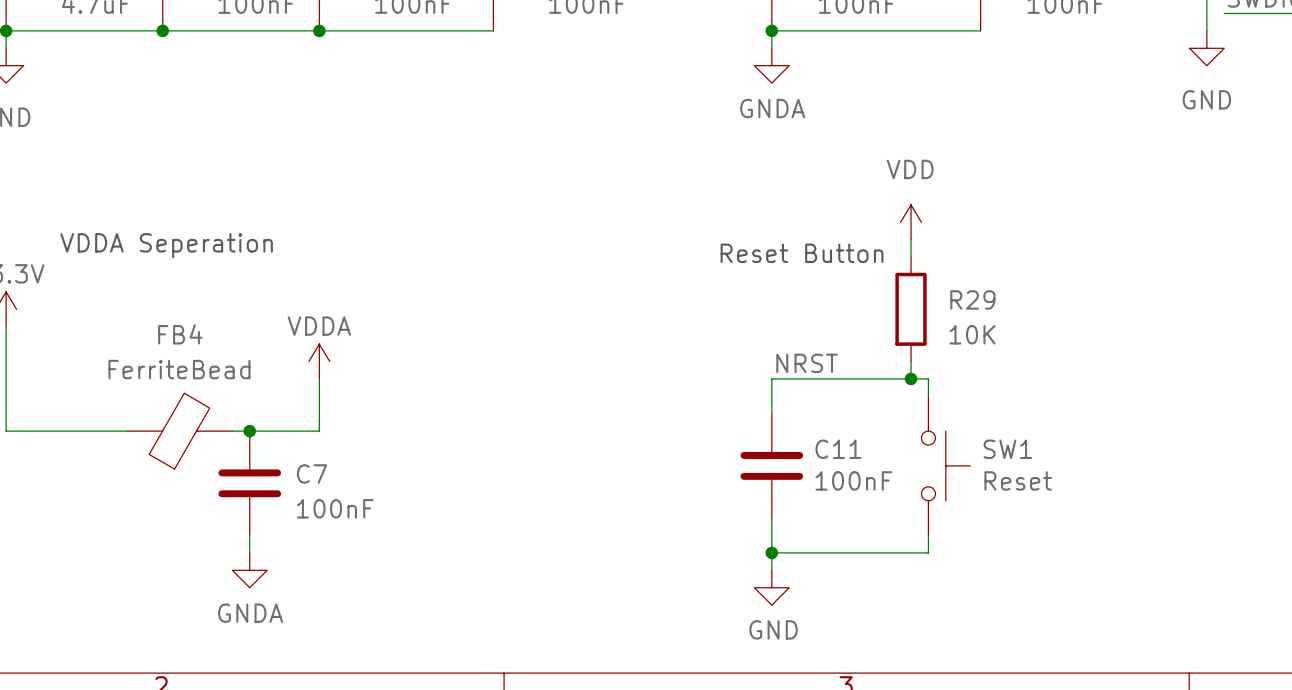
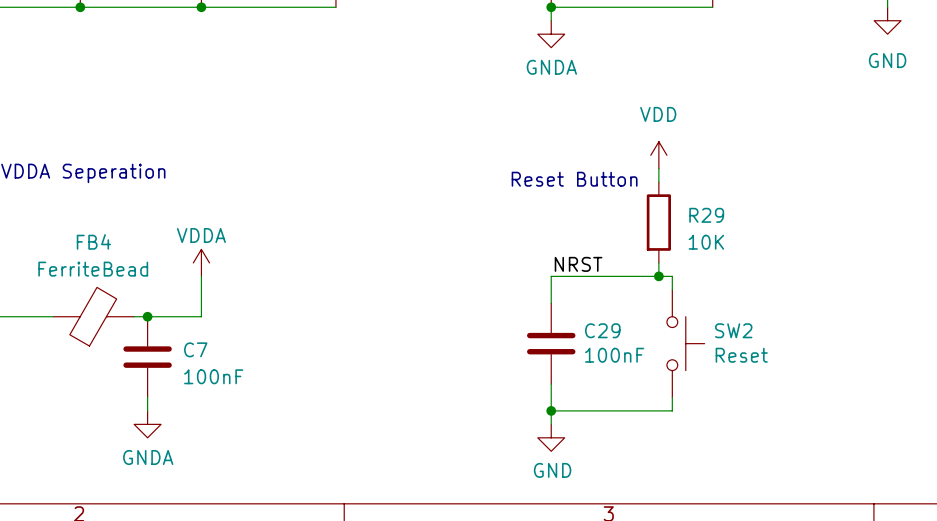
C11 name: C11 (838, 449) -> C29 (602, 330)
SW1 name: SW1 (1007, 449) -> SW2 (733, 330)

